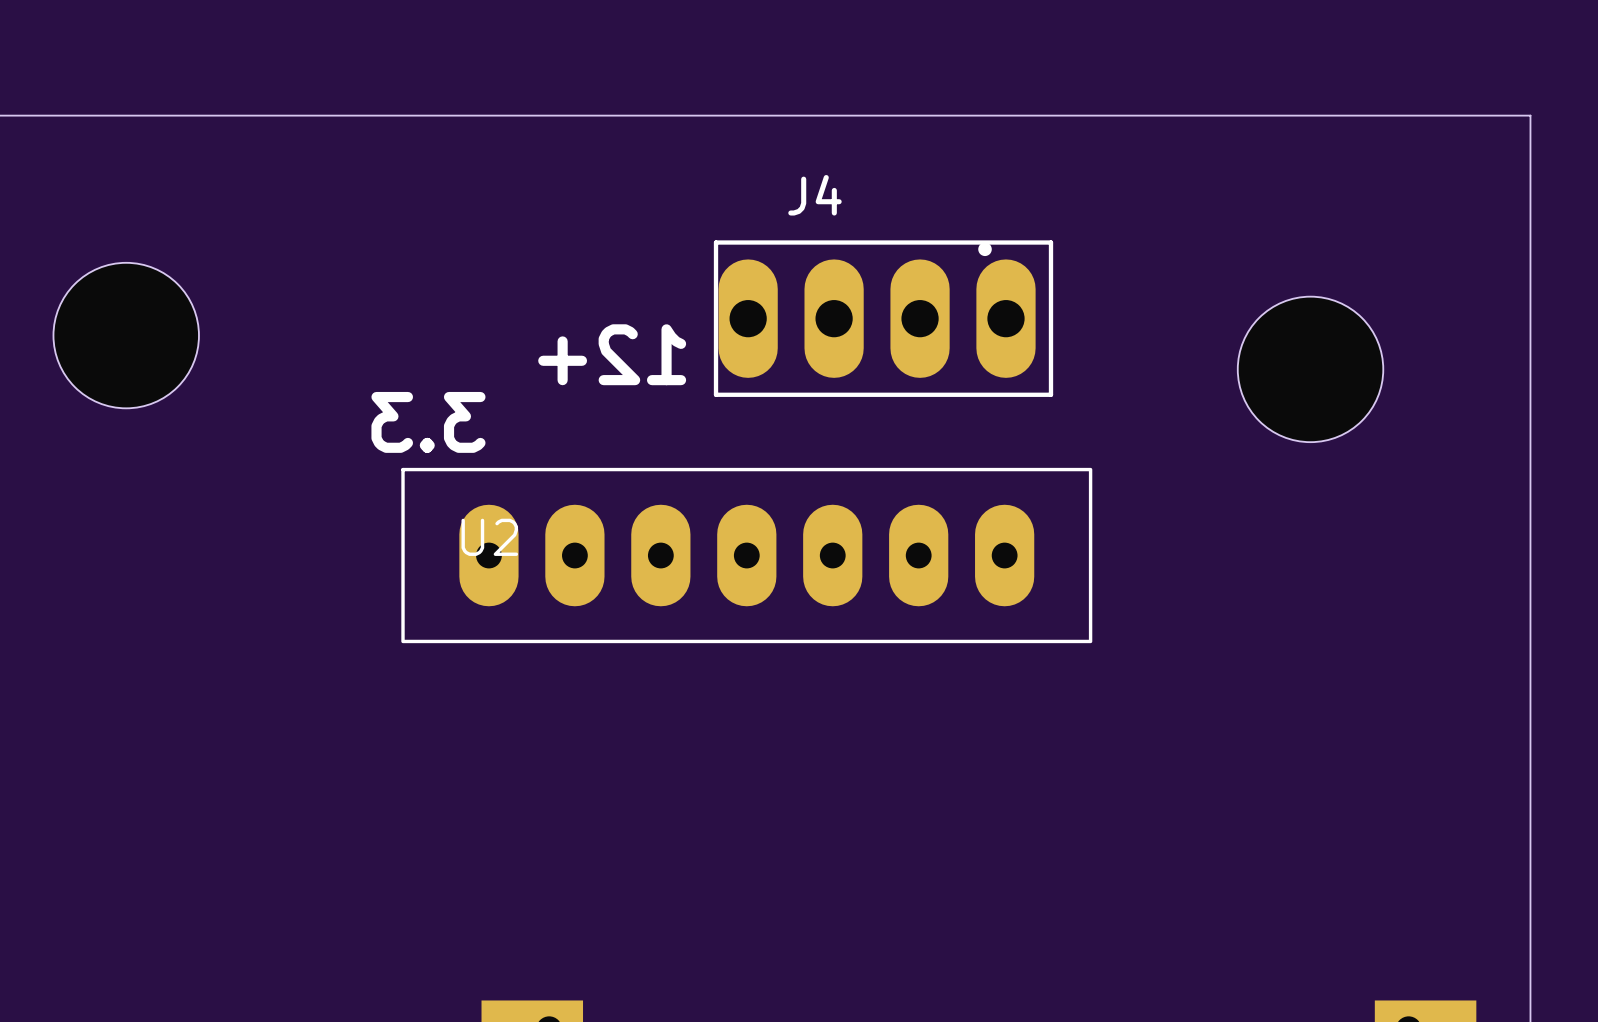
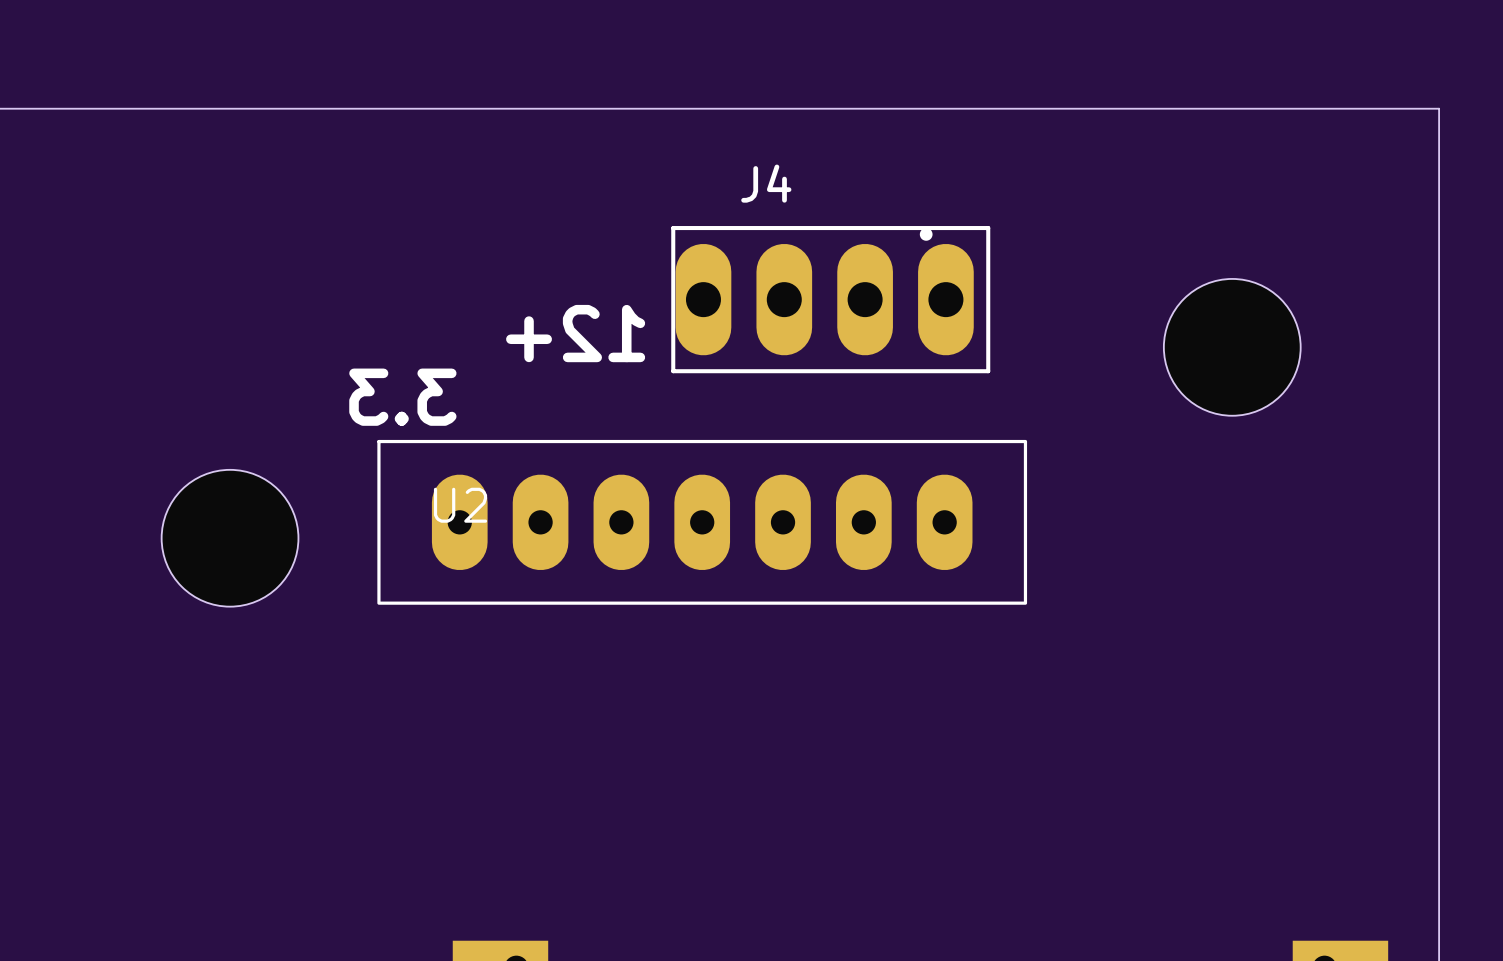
part position: (126, 335) -> (230, 538)

